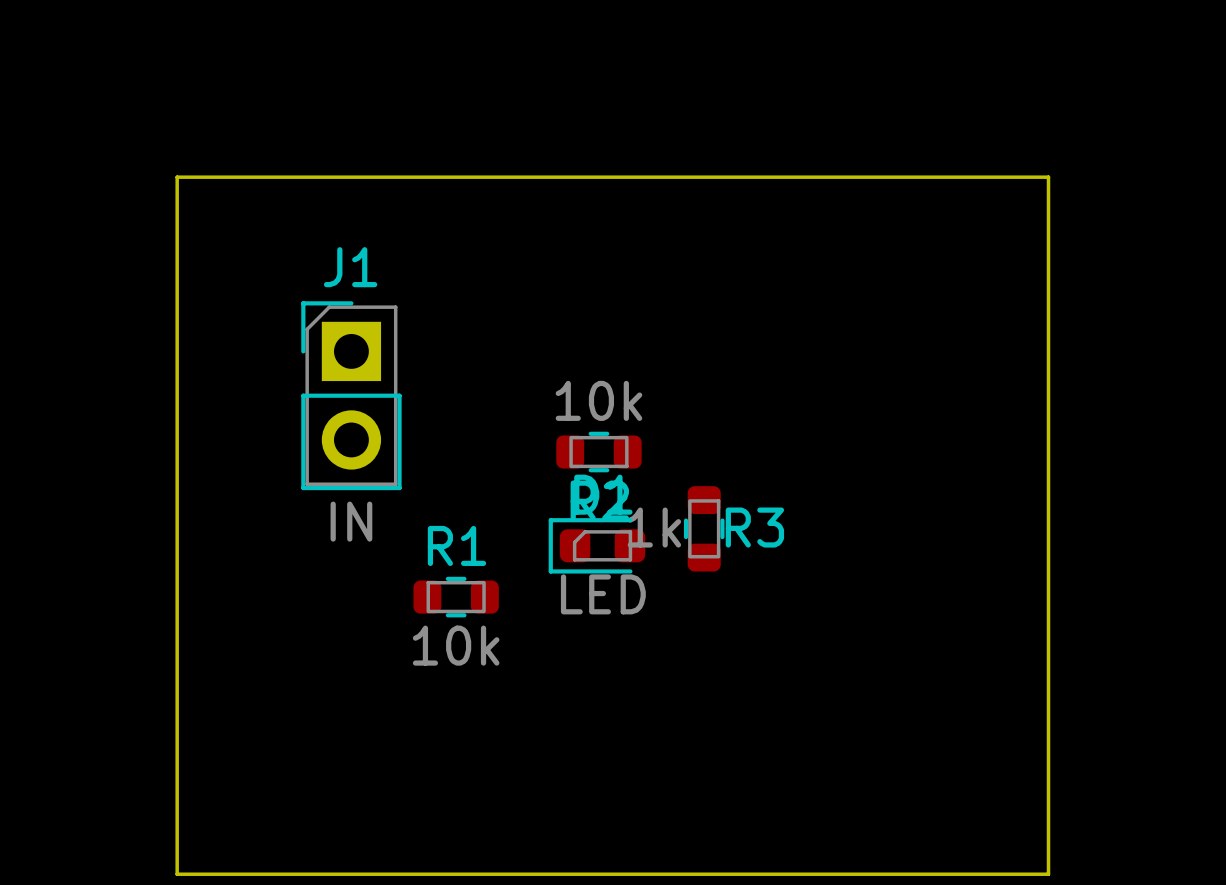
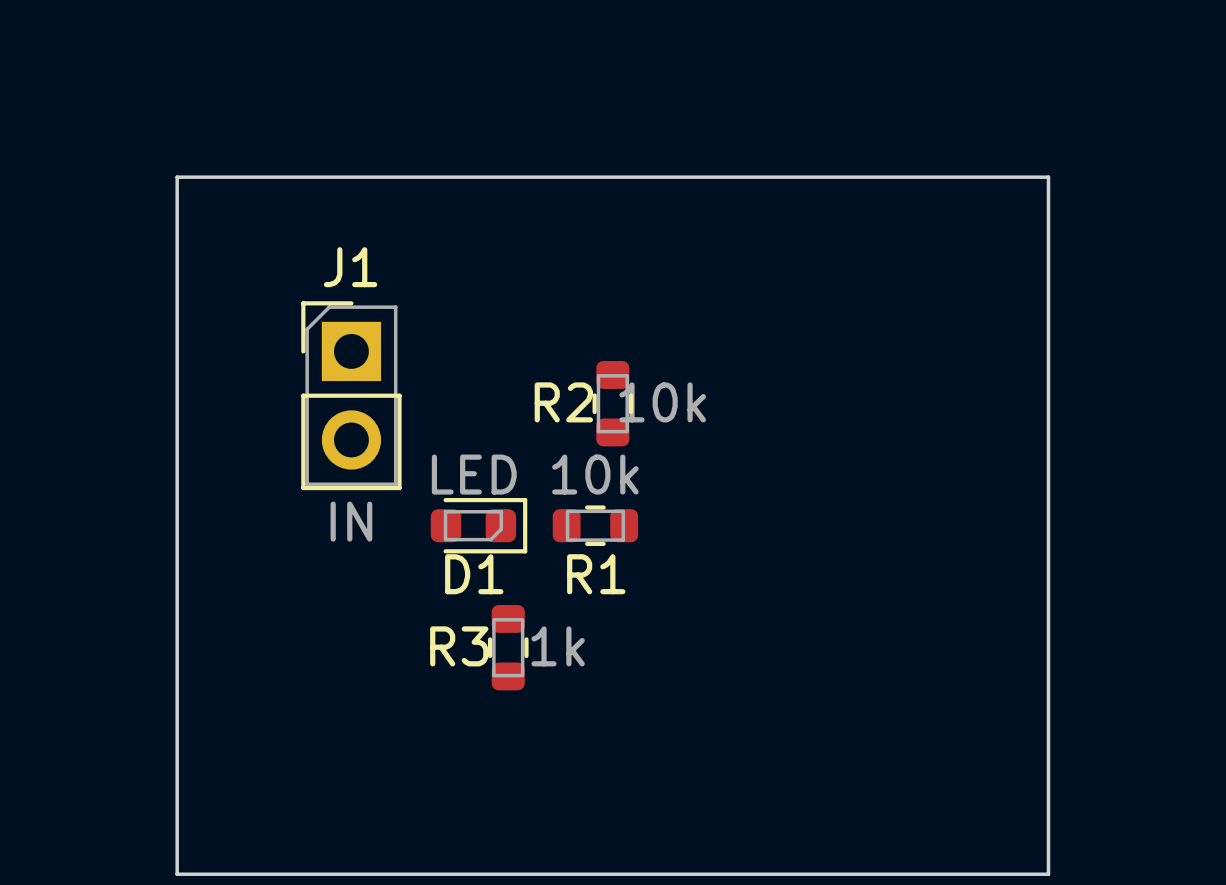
R2 rotation: 0° (598, 452) -> 90° clockwise (612, 403)
R3 value position: 1k (654, 527) -> 1k (558, 646)
R3 name position: R3 (754, 527) -> R3 (459, 646)
R3 position: (704, 528) -> (508, 647)
R1 name position: R1 (456, 545) -> R1 (596, 574)
D1 rotation: 0° (596, 545) -> 180° (479, 525)
D1 position: (596, 545) -> (479, 525)
R1 position: (456, 597) -> (595, 525)
R1 value position: 10k (456, 645) -> 10k (595, 474)

